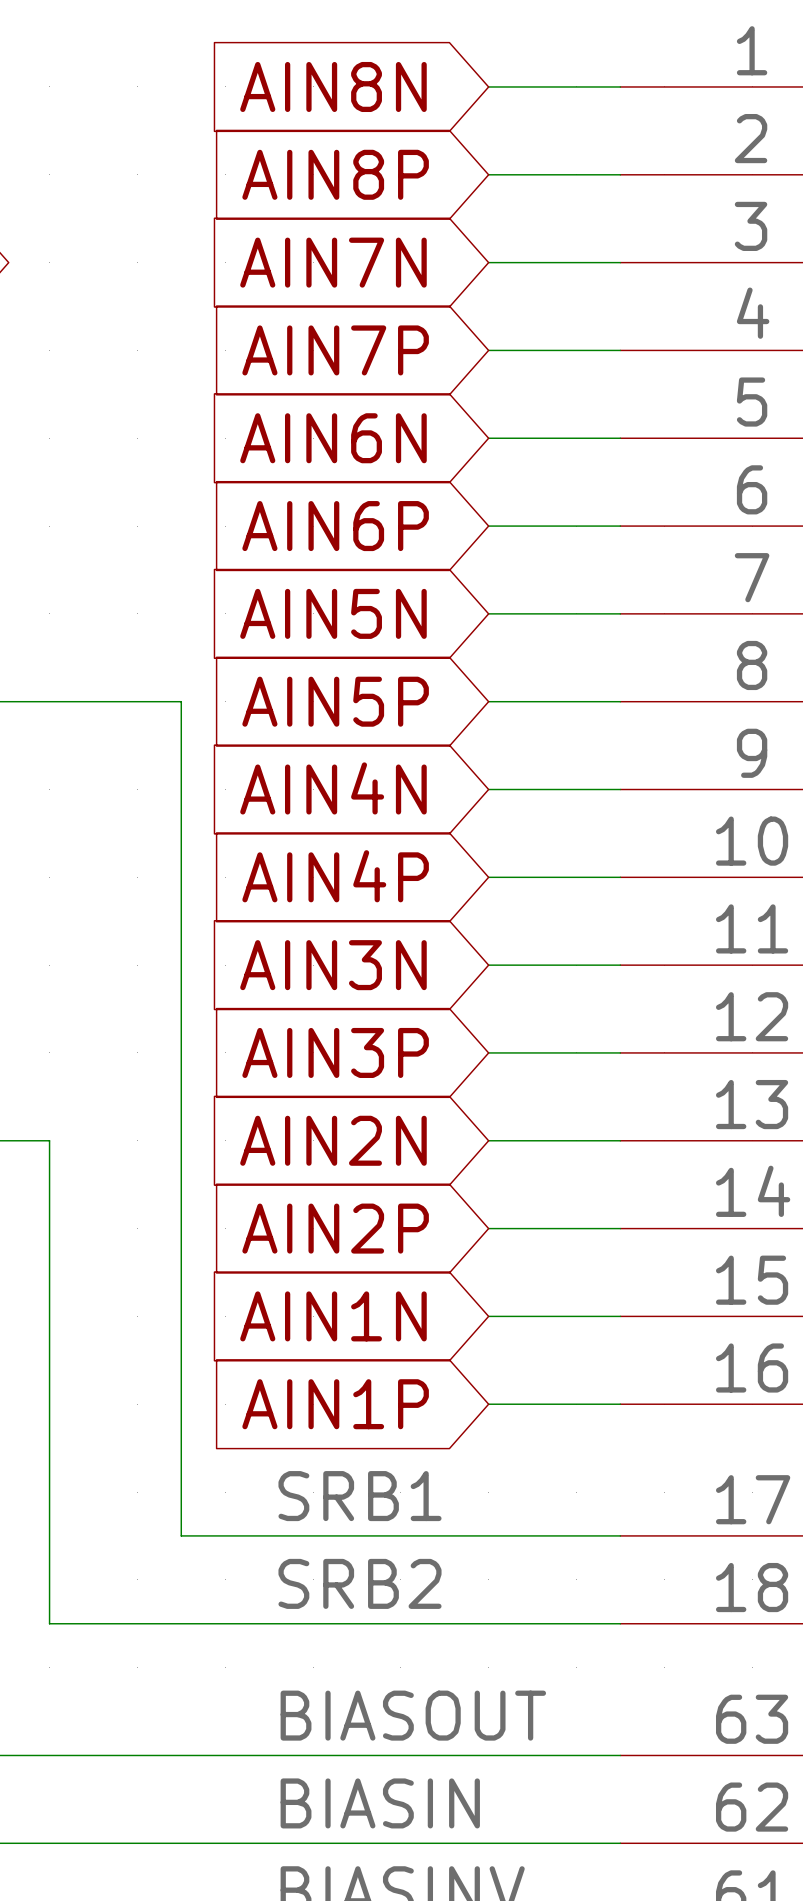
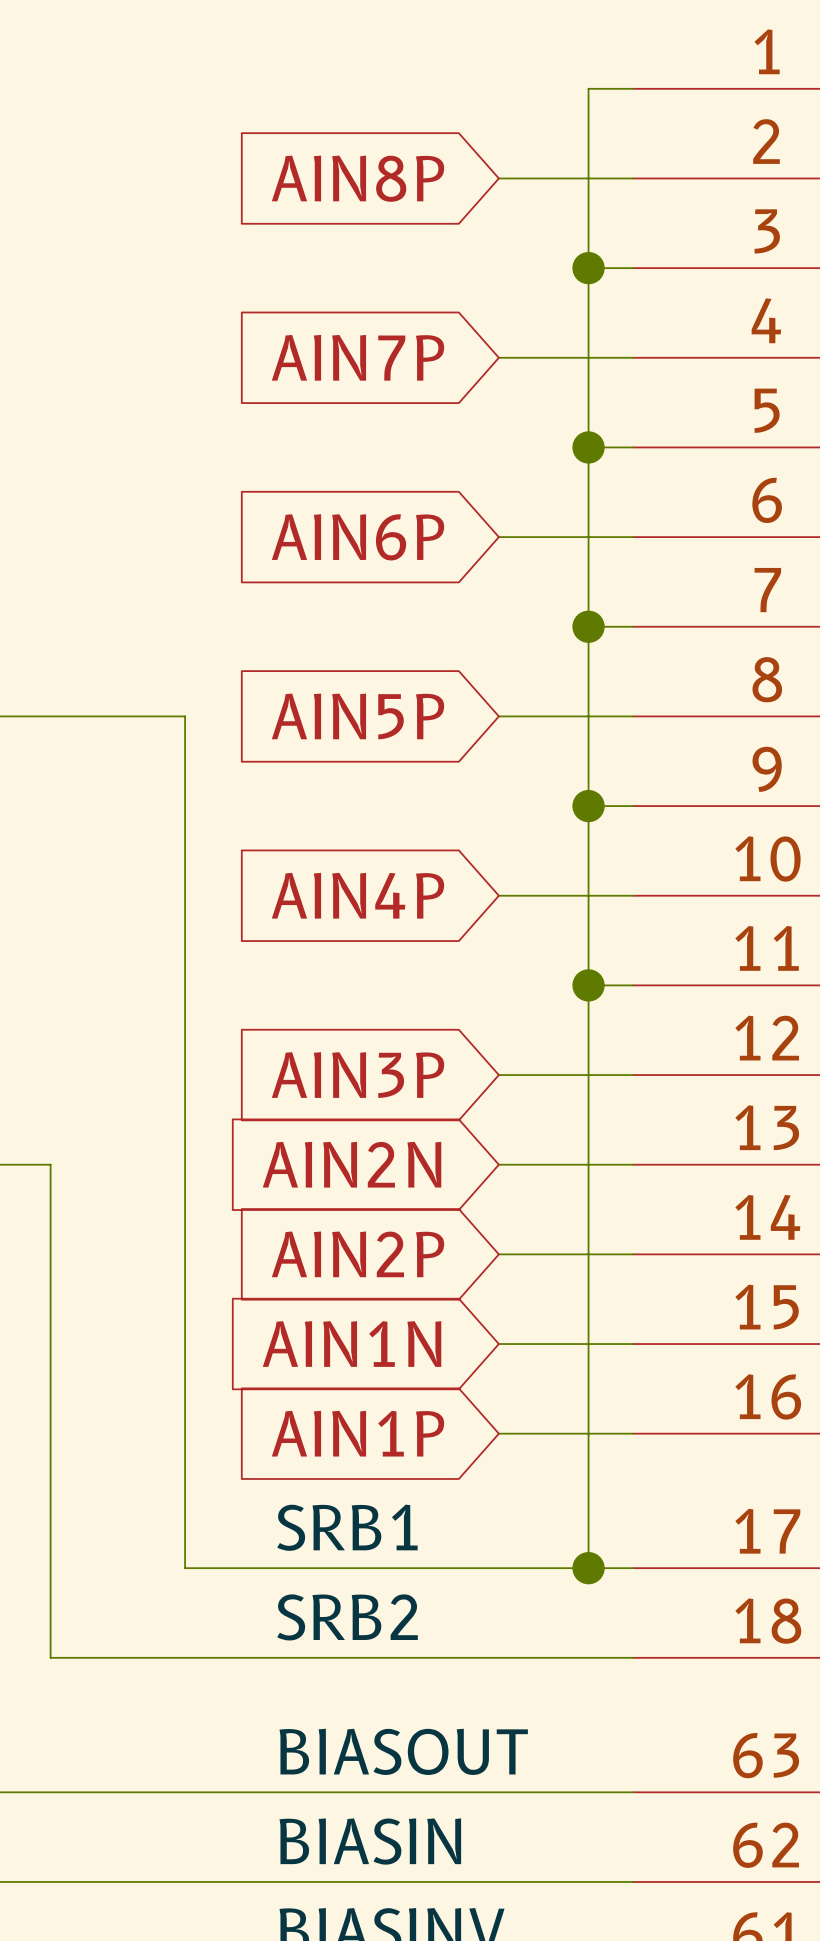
global label: AIN8N (333, 86) -> none
wire: (488, 86) (576, 86) -> (588, 1568) (588, 88)
global label: AIN7N (333, 262) -> none
wire: (488, 262) (576, 262) -> none
junction: none -> (588, 268)
global label: AIN6N (333, 438) -> none
wire: (488, 438) (576, 438) -> none
junction: none -> (588, 447)
global label: AIN5N (333, 613) -> none
wire: (488, 613) (576, 613) -> none
junction: none -> (588, 626)
global label: AIN4N (333, 788) -> none
wire: (488, 789) (576, 789) -> none
junction: none -> (588, 806)
global label: AIN3N (333, 965) -> none
wire: (488, 965) (576, 965) -> none
junction: none -> (588, 985)
junction: none -> (588, 1568)

